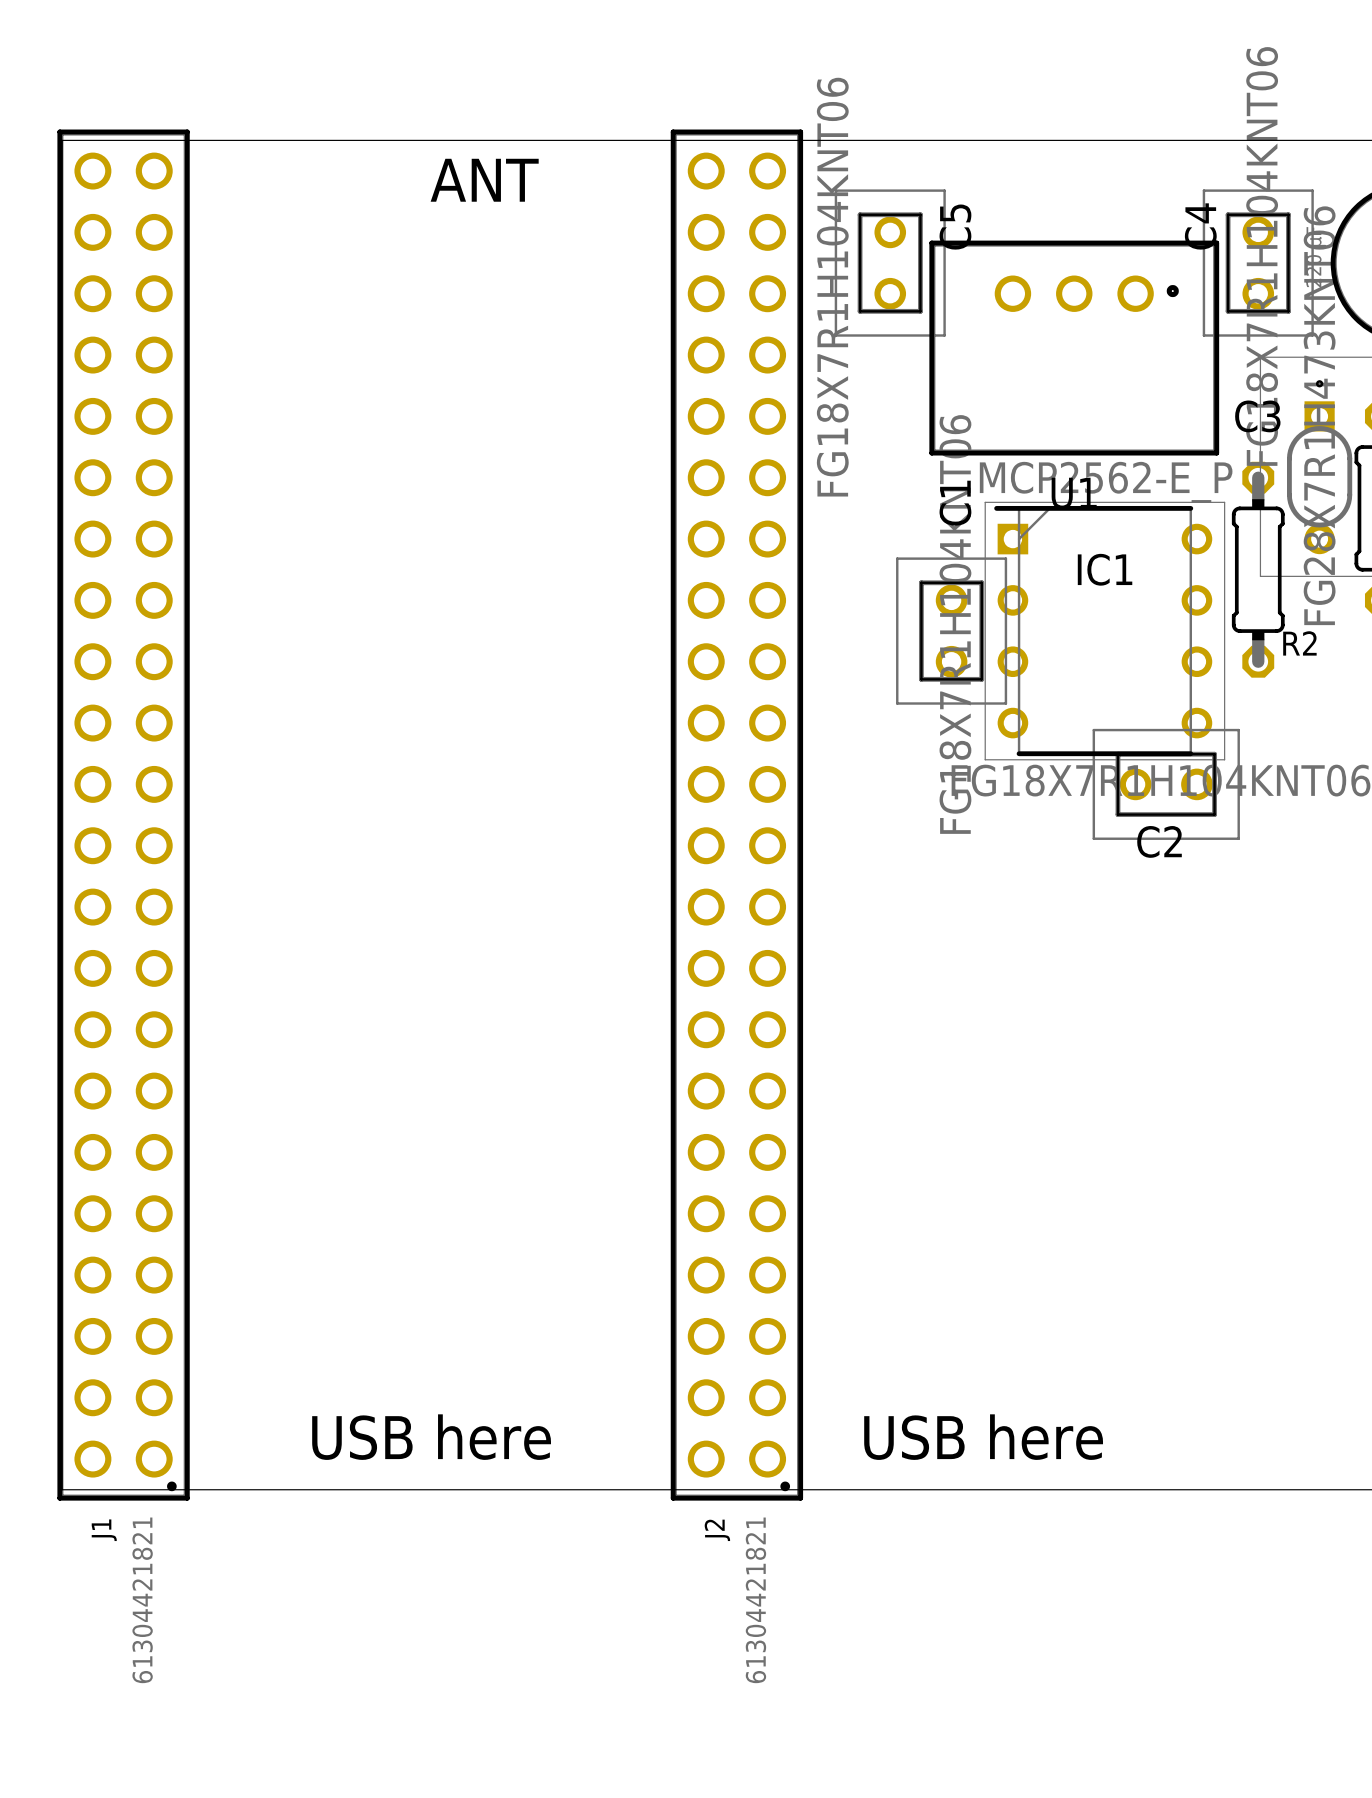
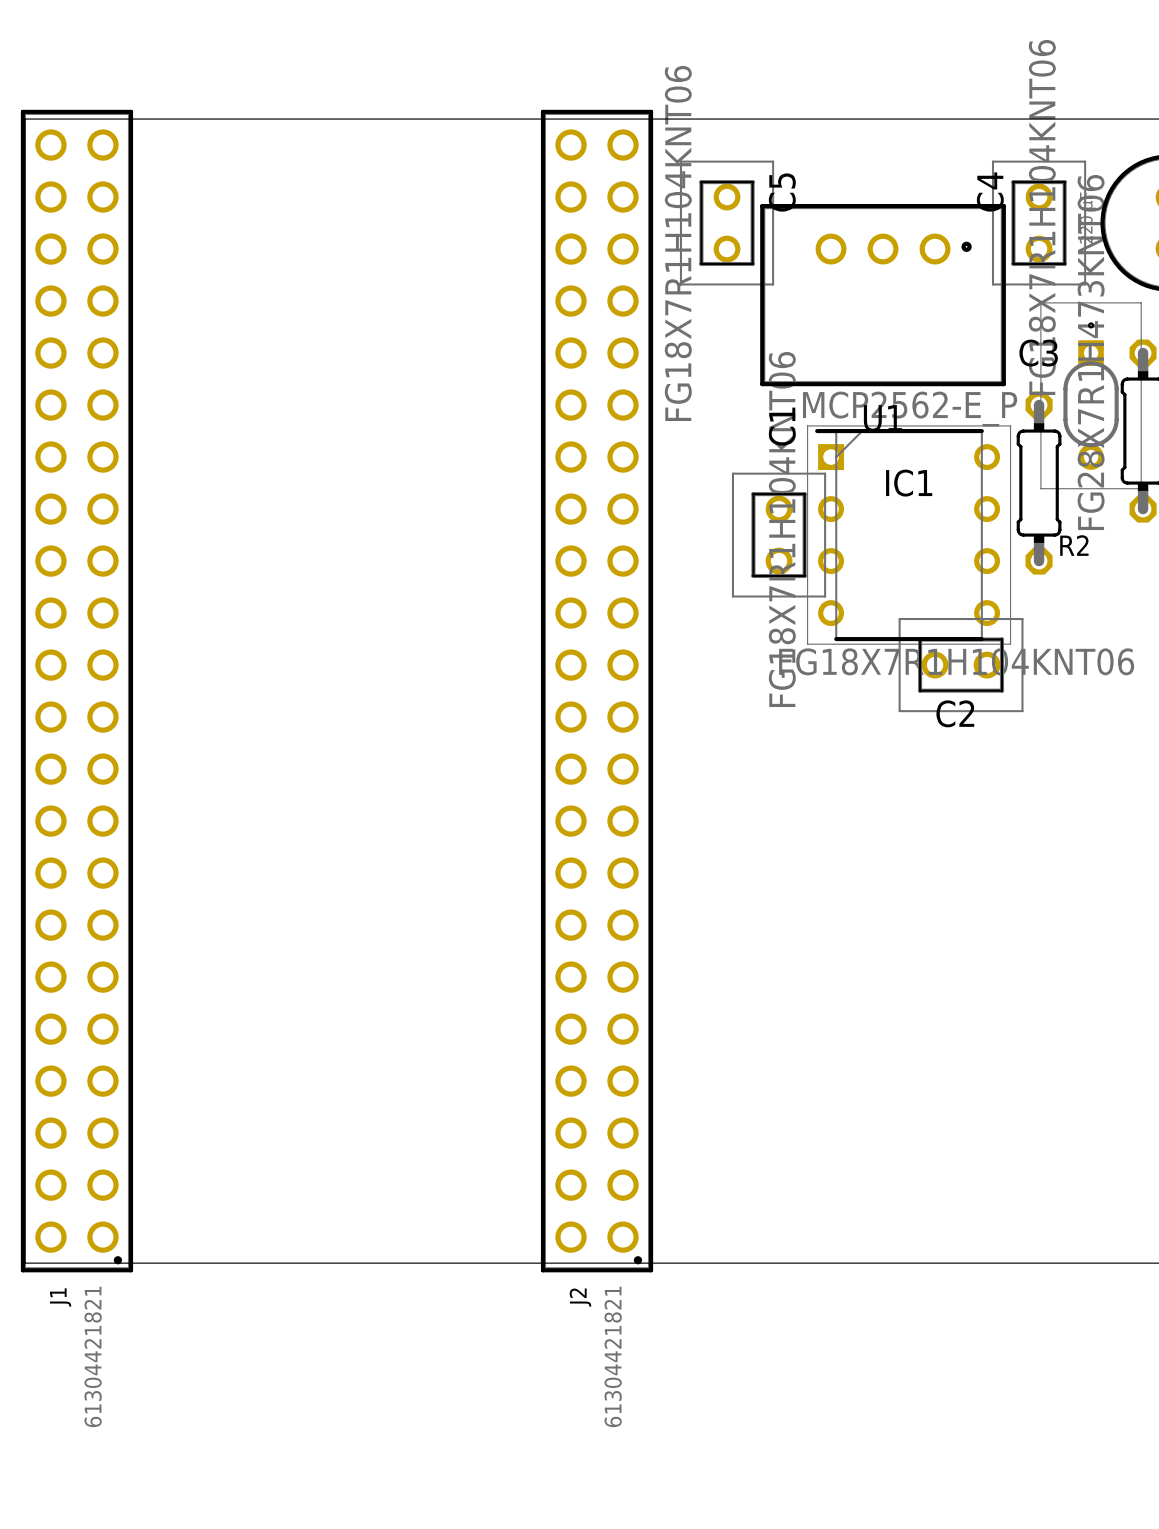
text: ANT (484, 180) -> none
text: USB here (431, 1437) -> none
text: USB here (983, 1437) -> none

